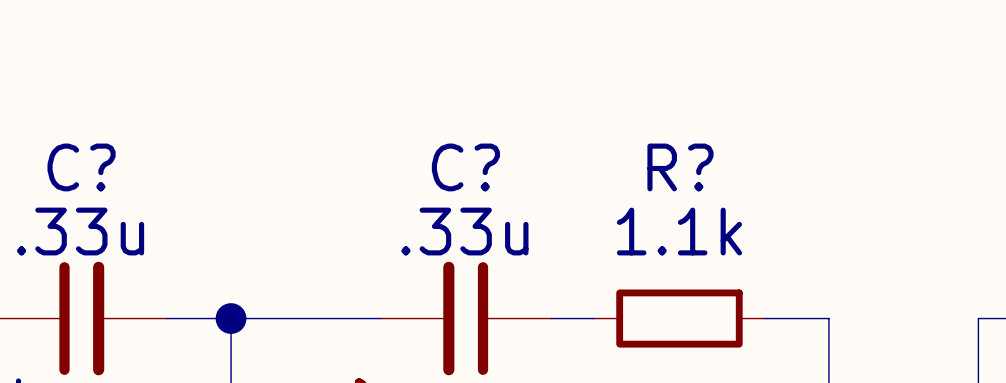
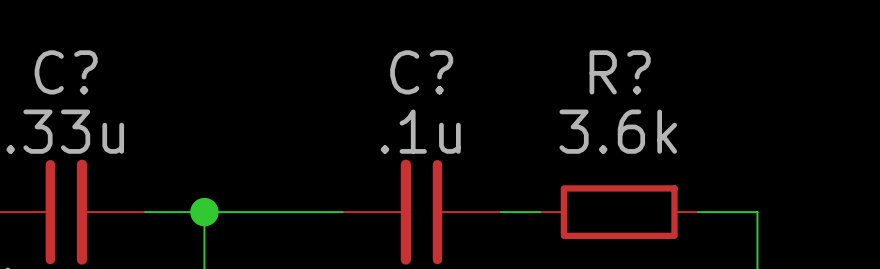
C? value: .33u (464, 231) -> .1u (420, 131)
R? value: 1.1k (679, 231) -> 3.6k (618, 131)

